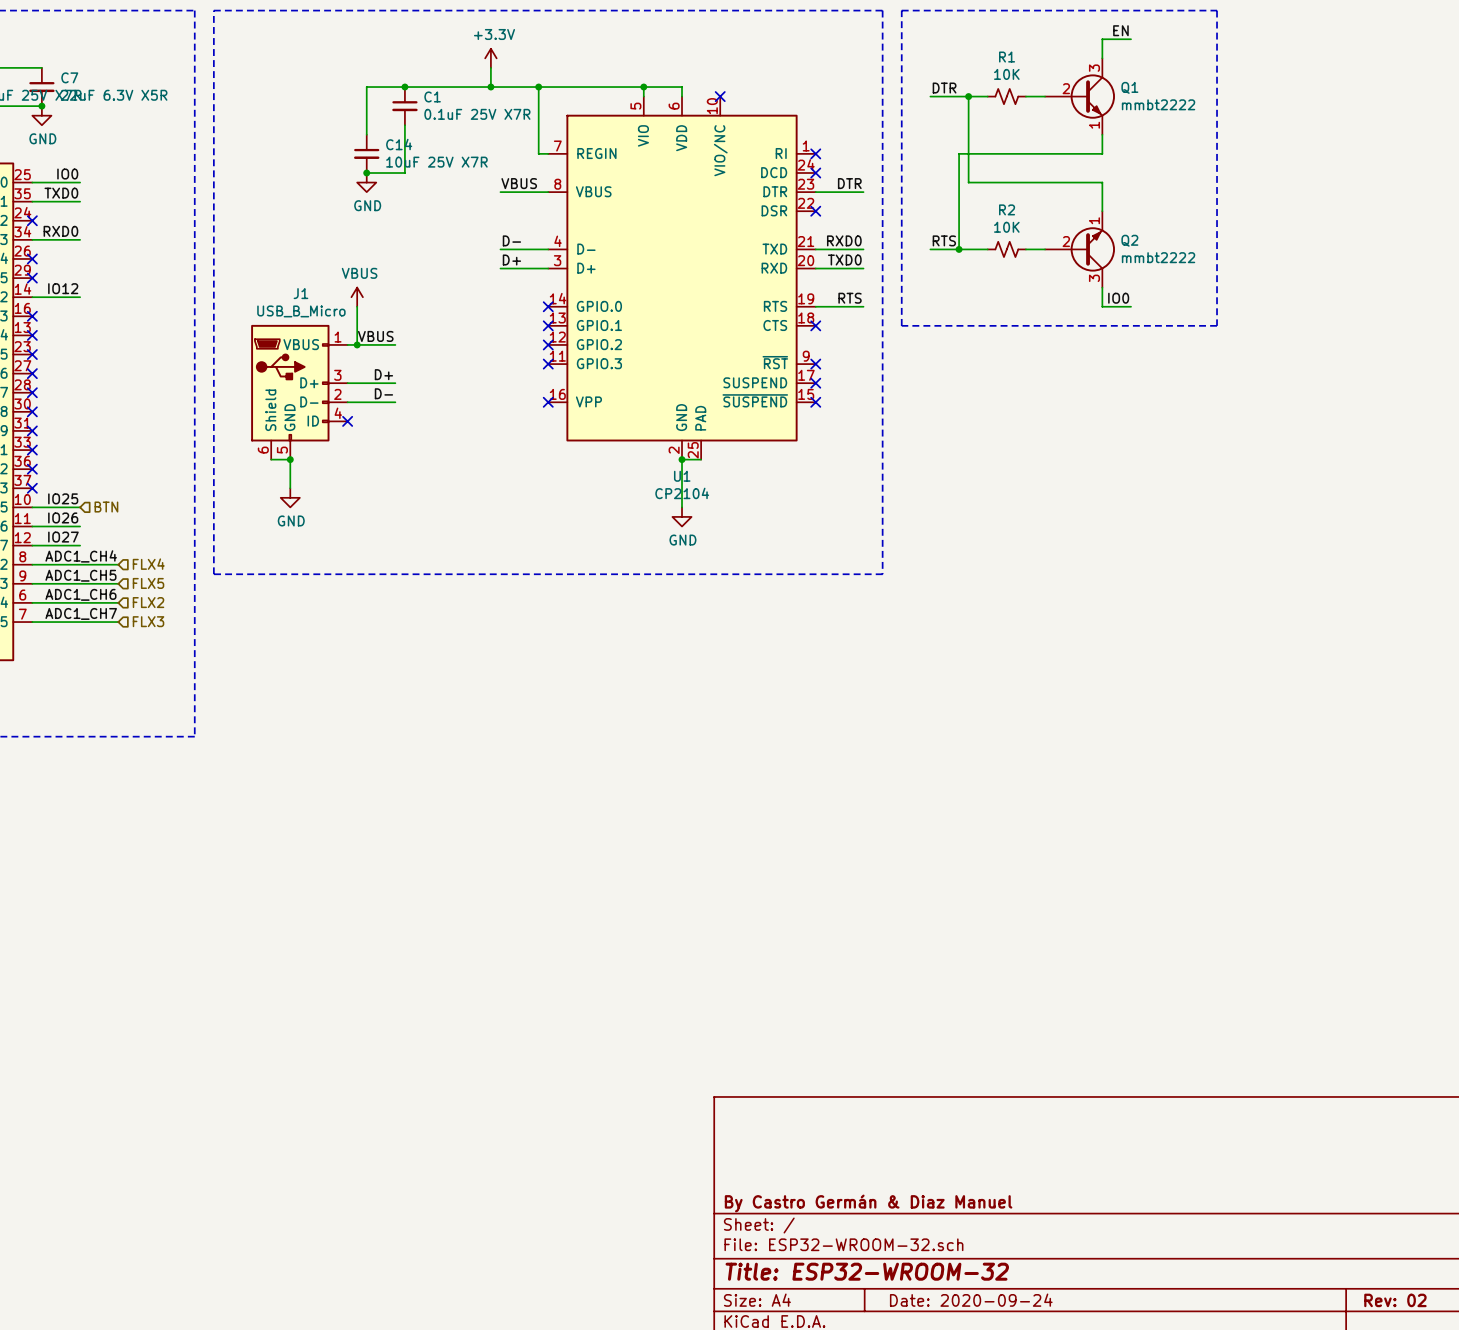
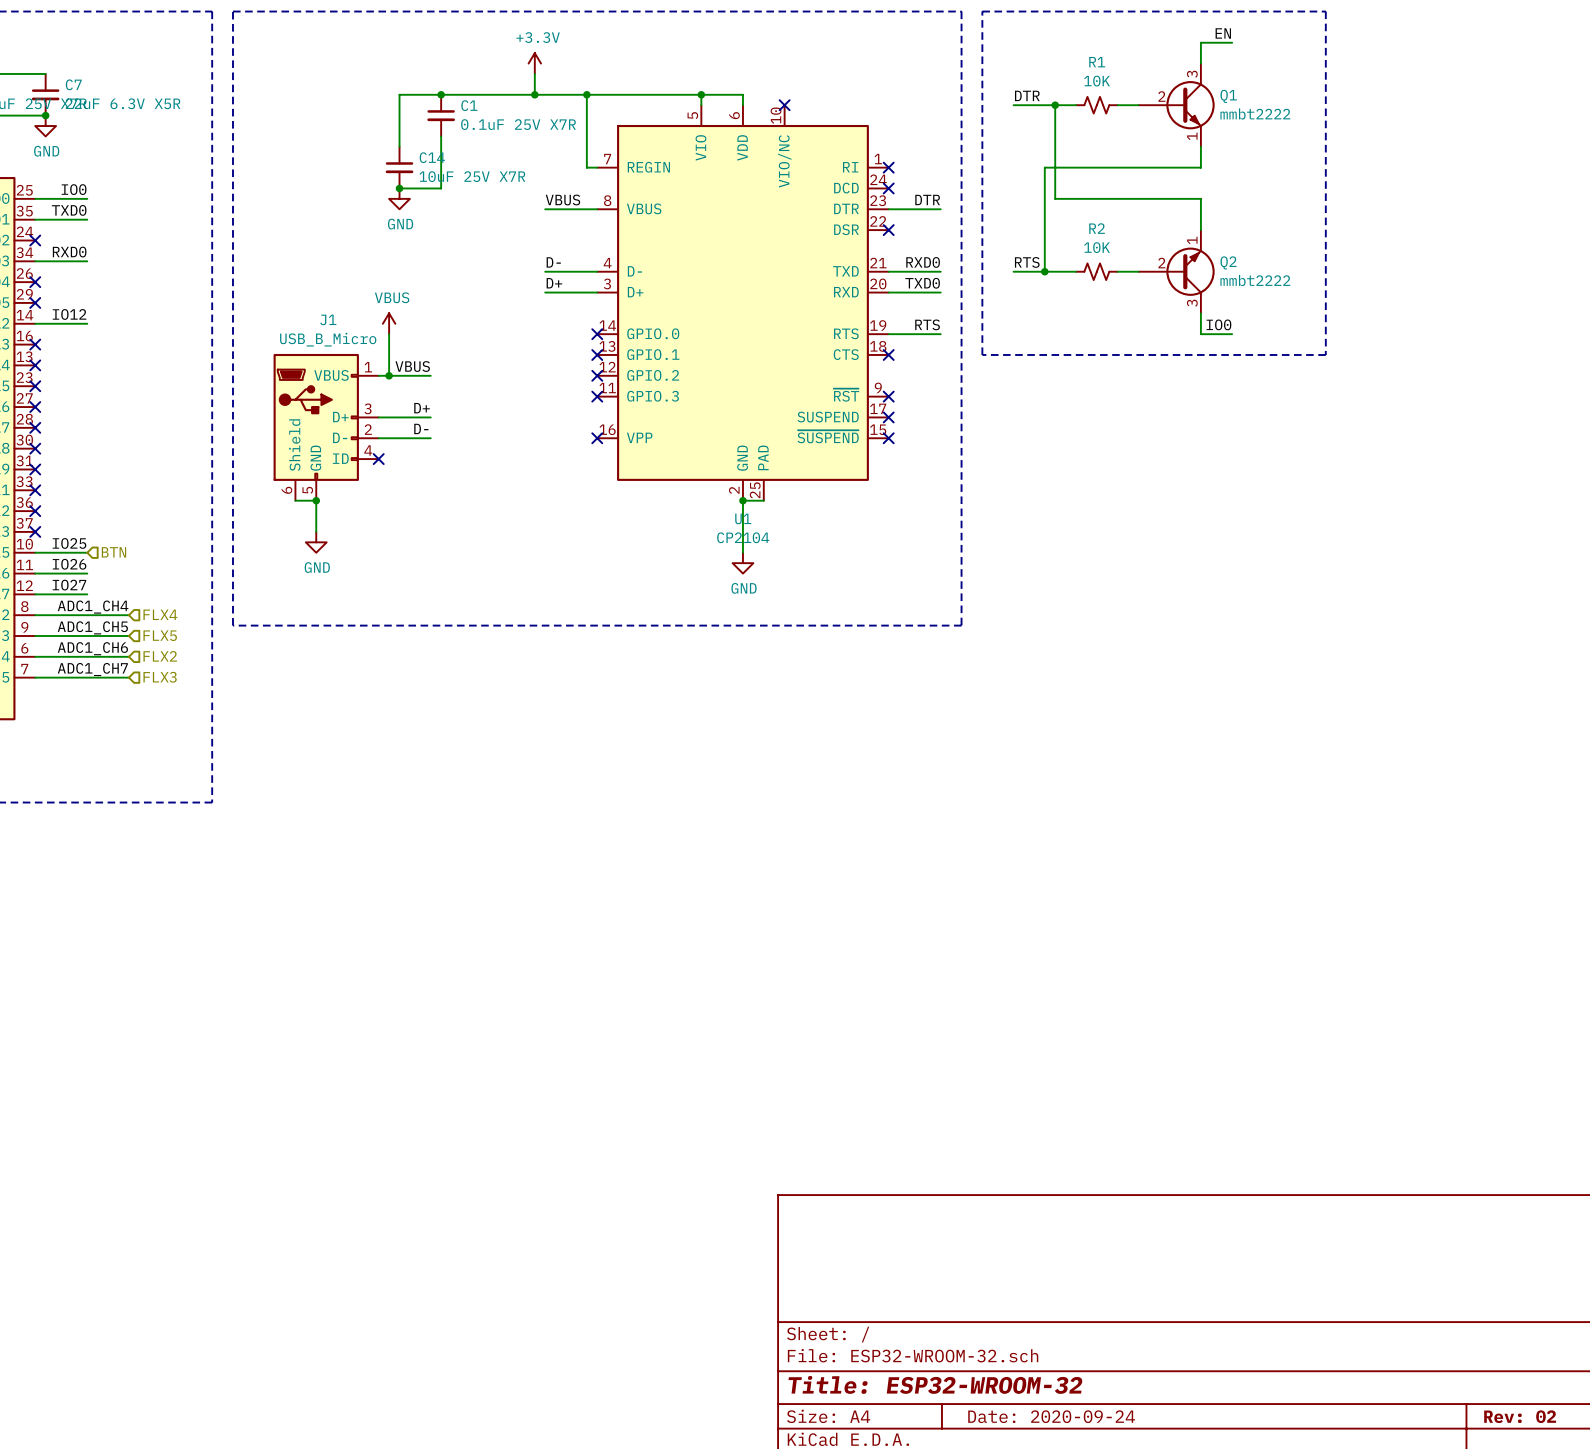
title block: By Castro Germán & Diaz Manuel (868, 1203) -> none

